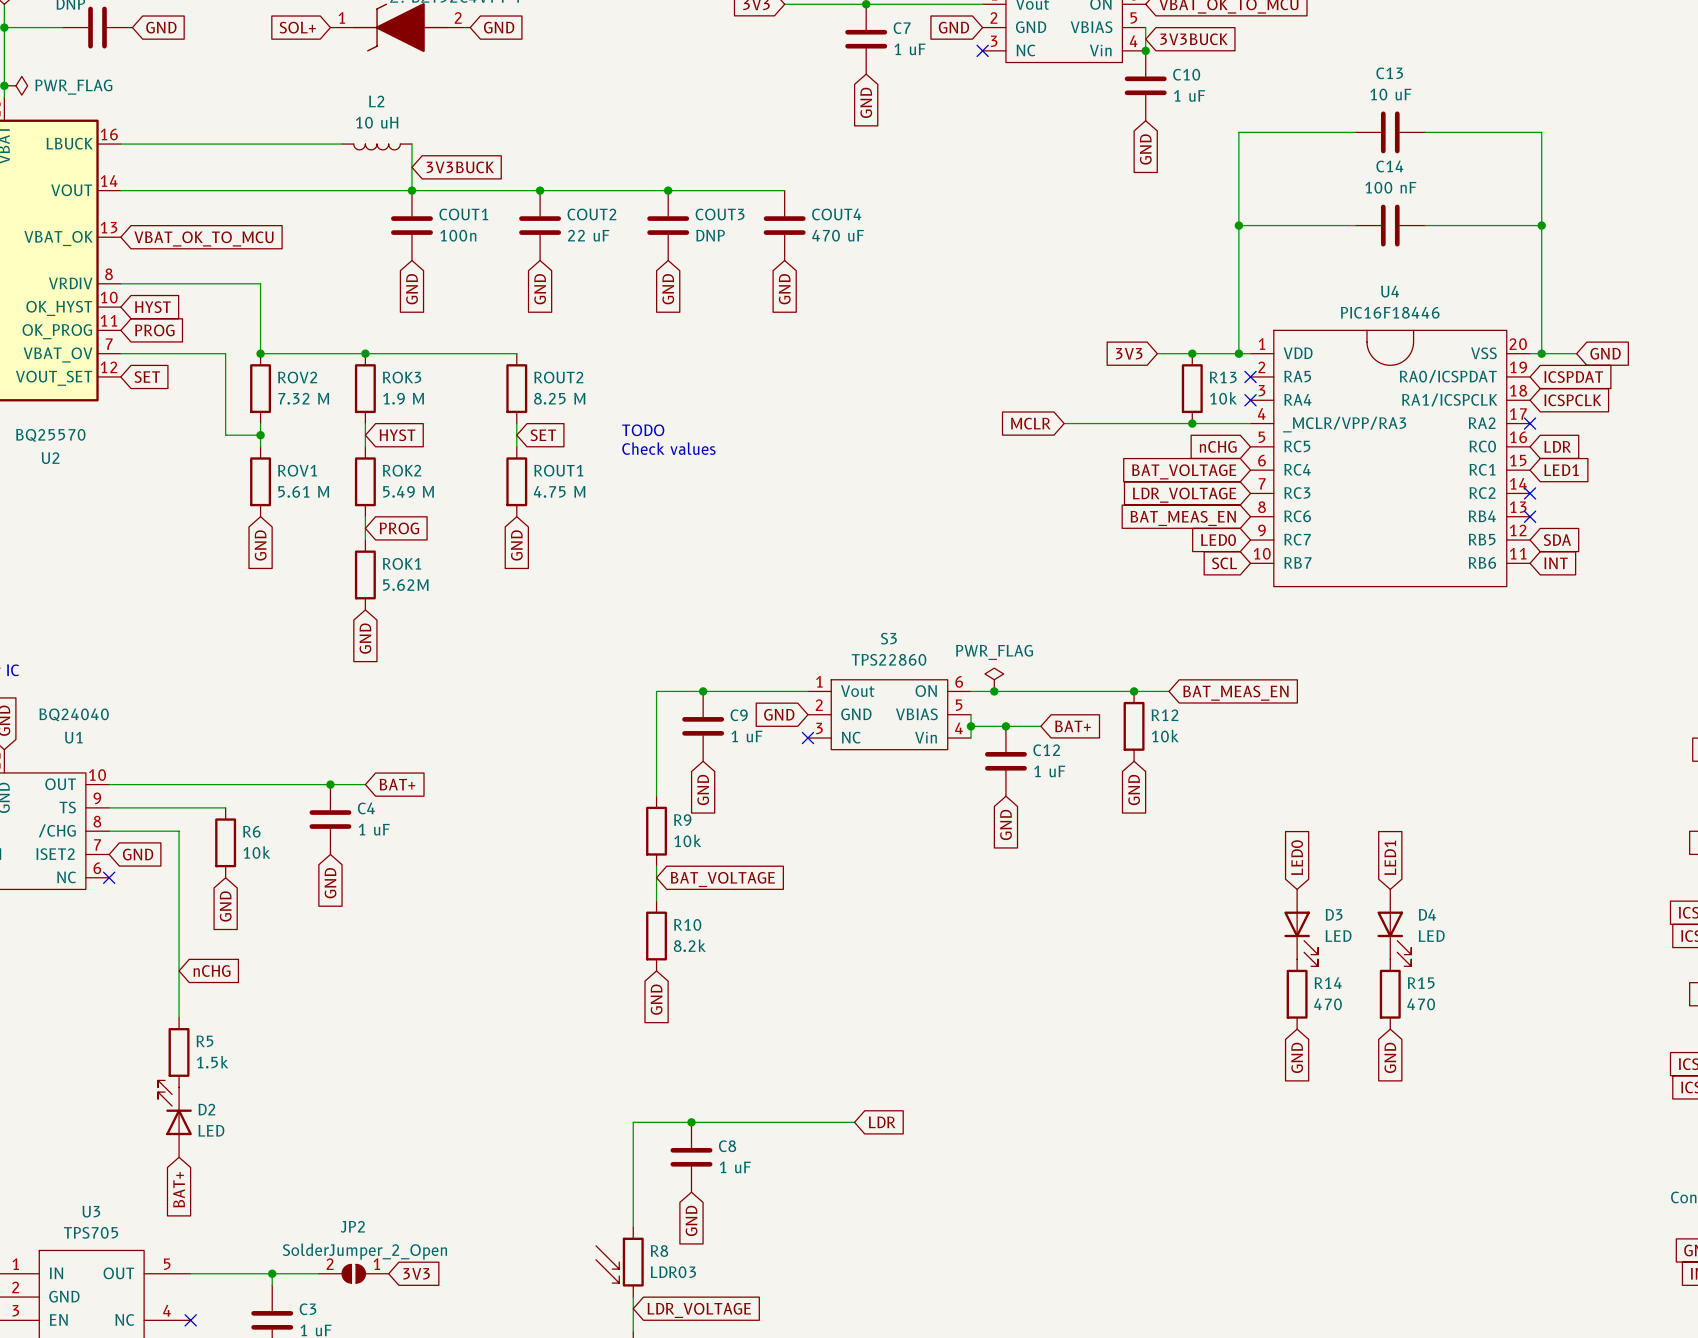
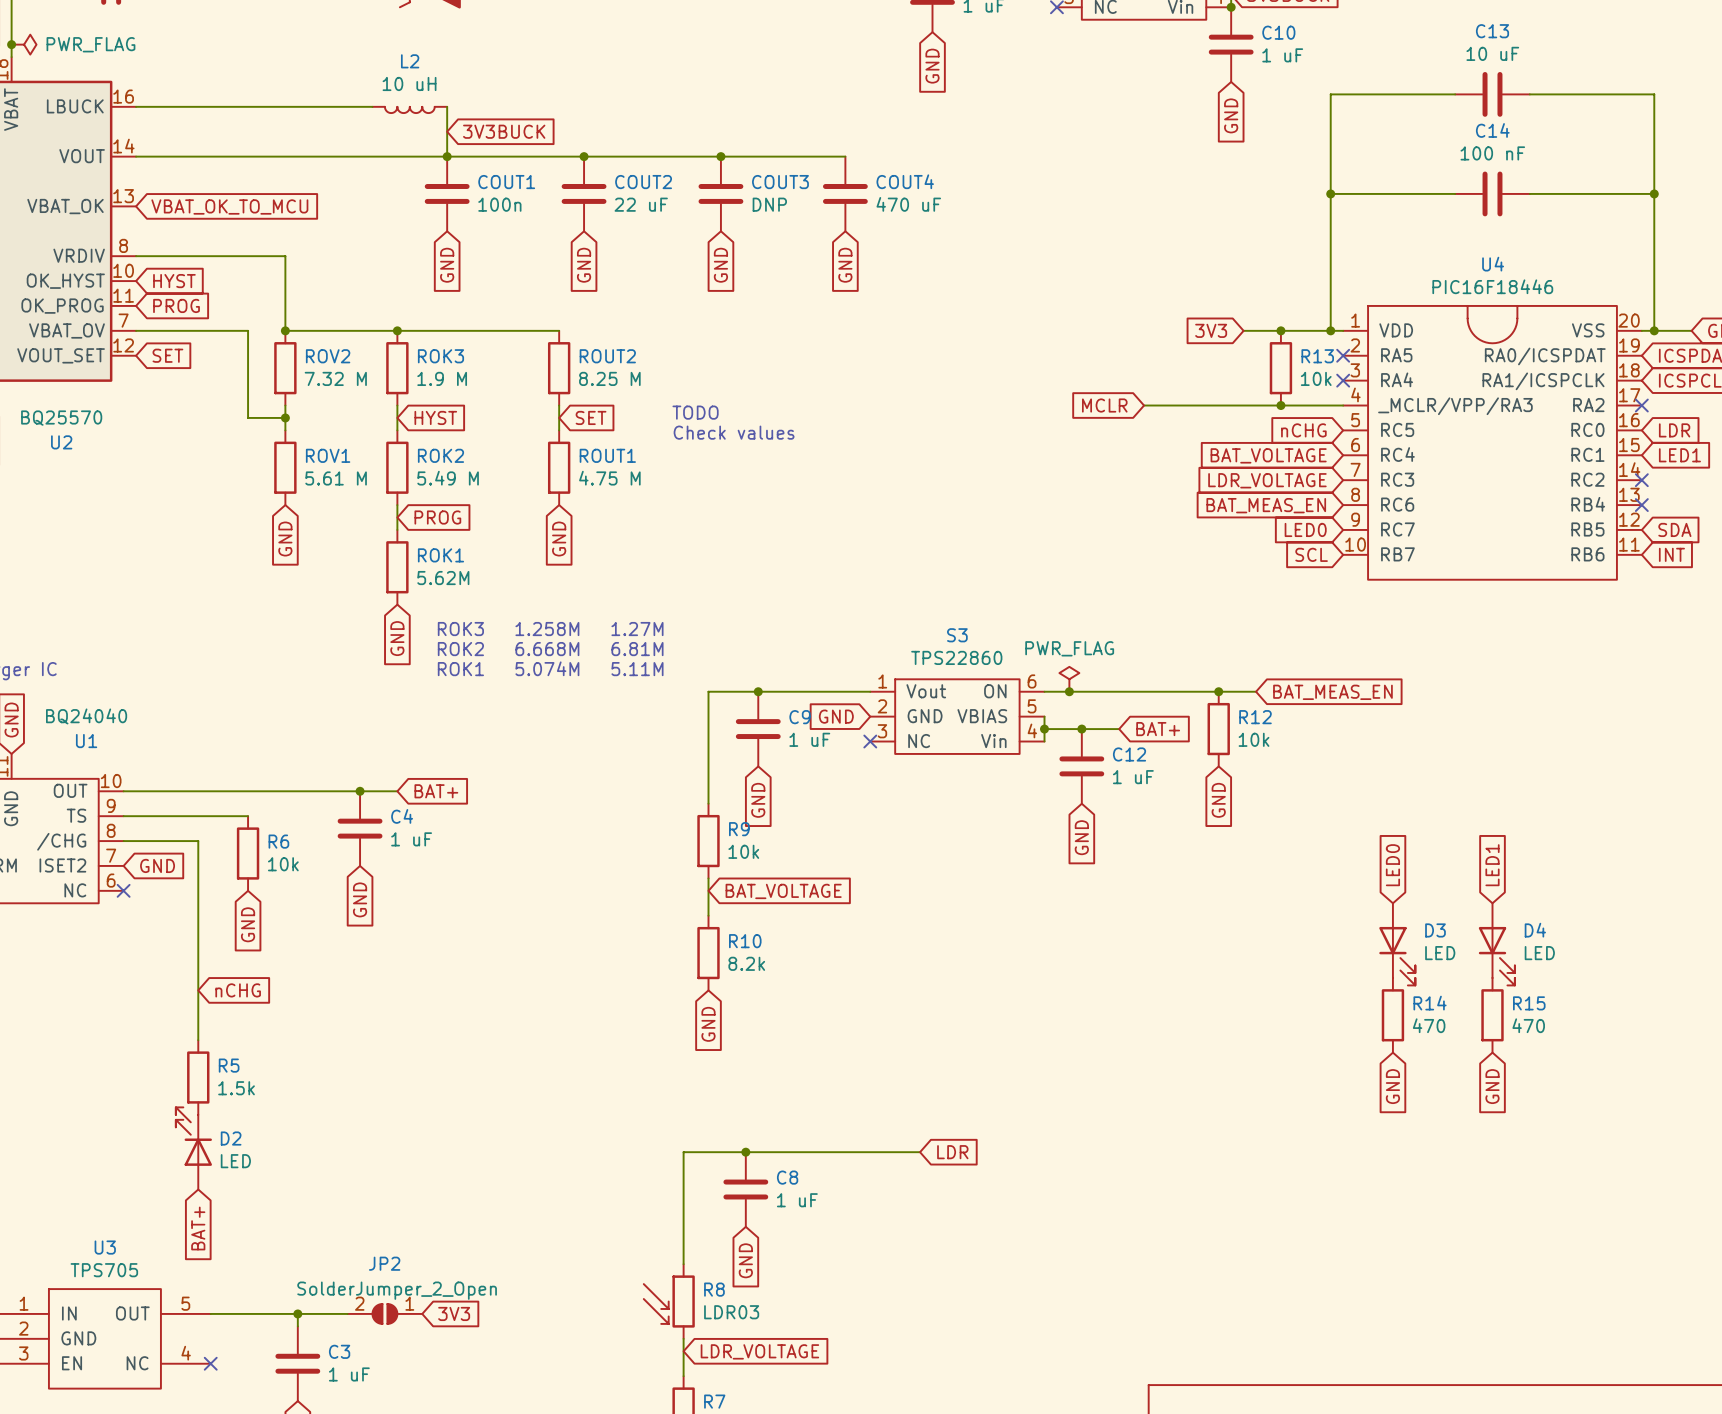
text: none -> ROK3 1.258M 1.27M (550, 629)
text: none -> ROK2 6.668M 6.81M (550, 649)
text: none -> ROK1 5.074M 5.11M (550, 668)

